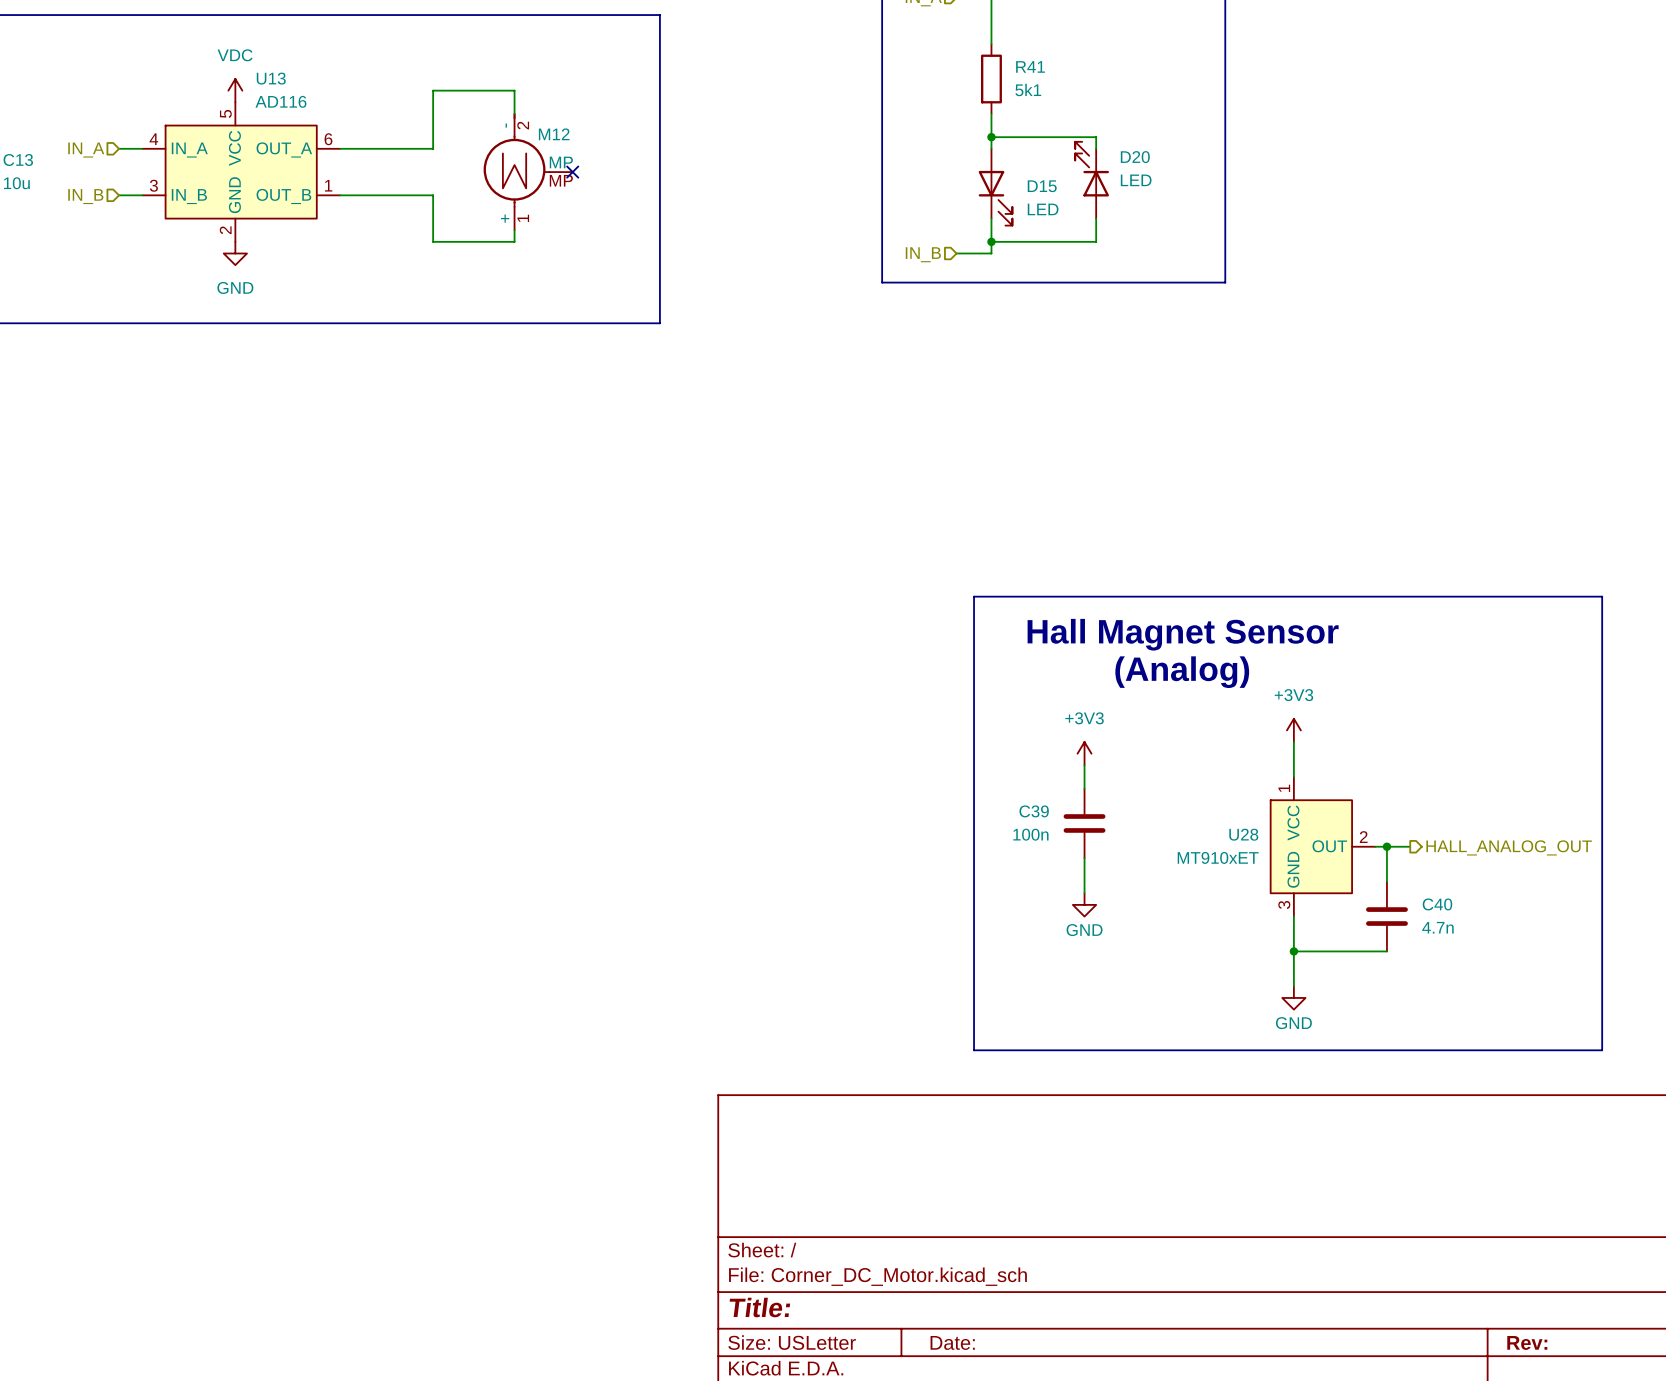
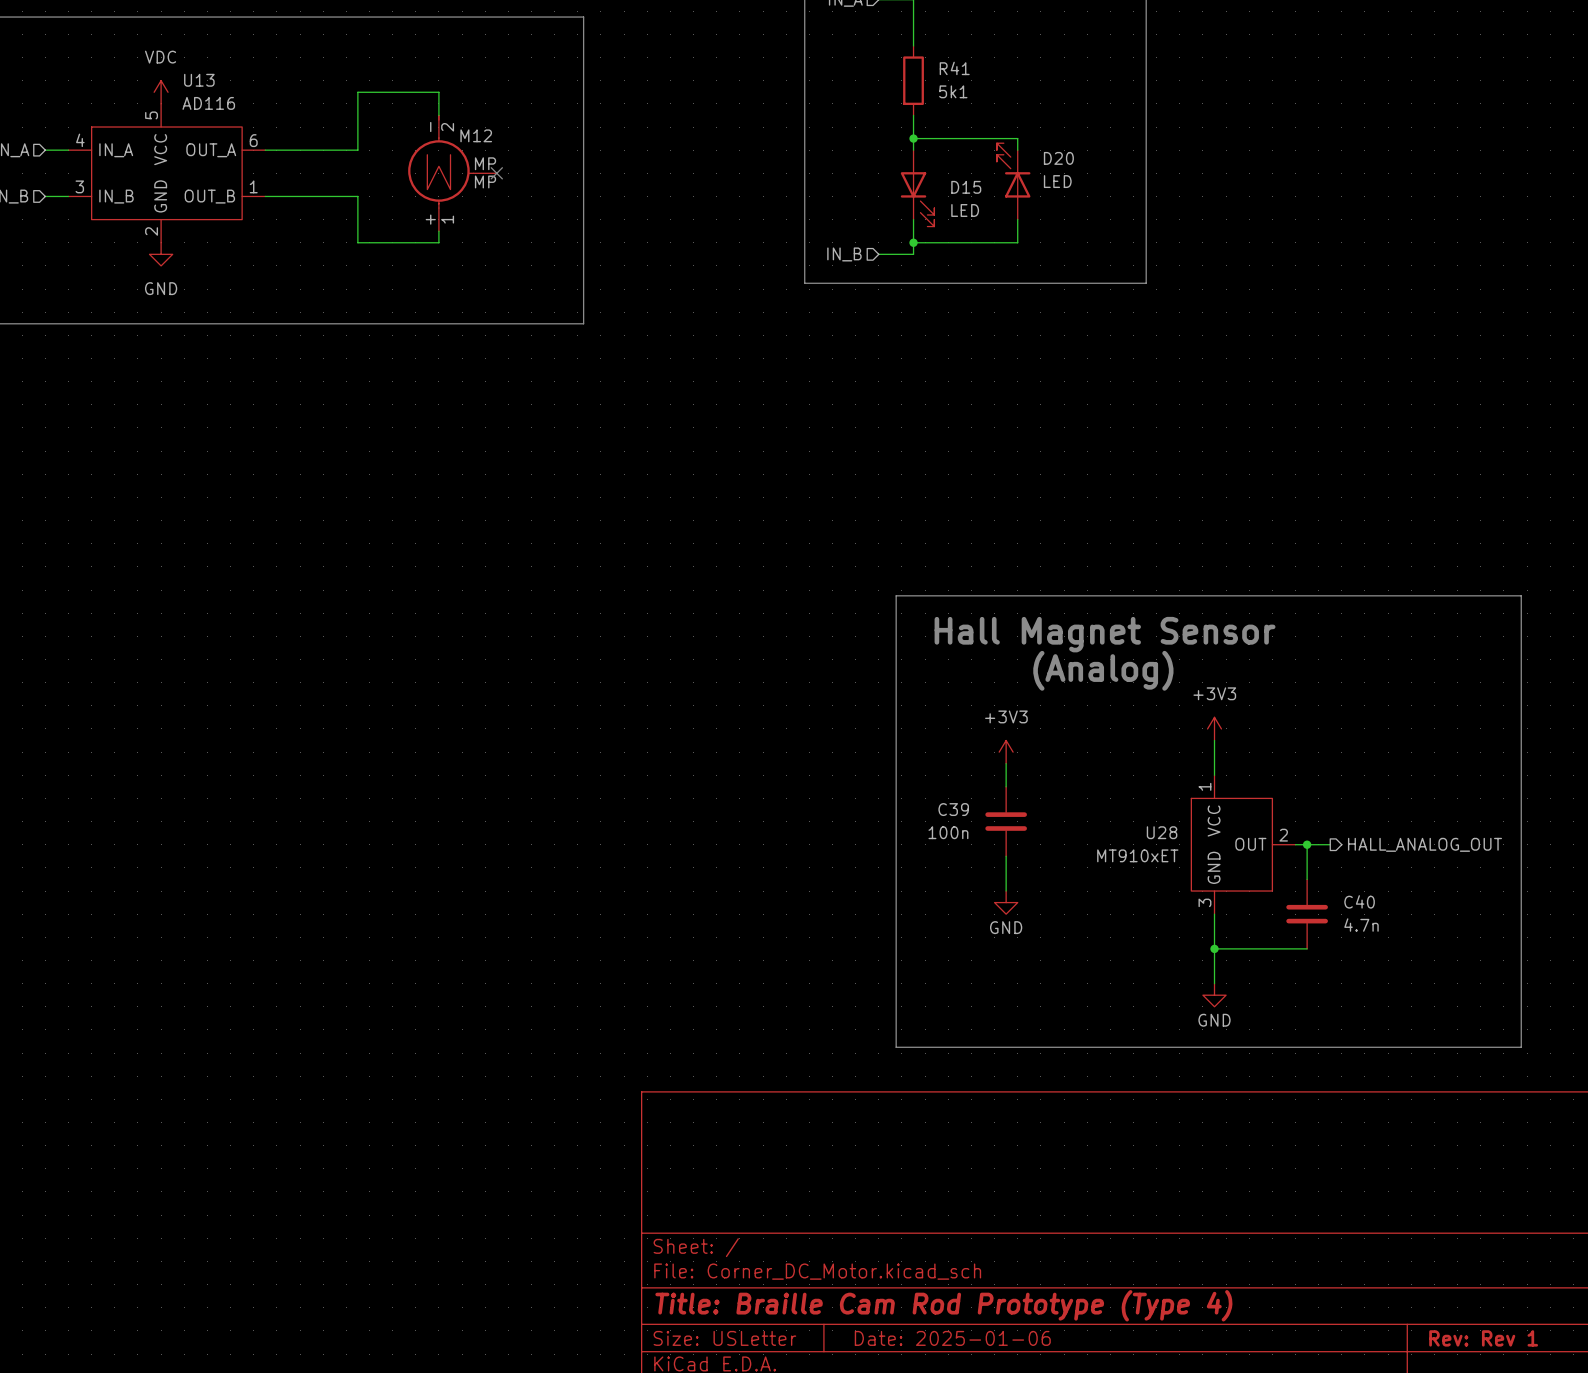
title block: Title: (759, 1307) -> Title: Braille Cam Rod Prototype (Type 4) (943, 1305)
title block: Date: (952, 1342) -> Date: 2025-01-06 (952, 1338)
title block: Rev: (1527, 1342) -> Rev: Rev 1 (1483, 1338)

